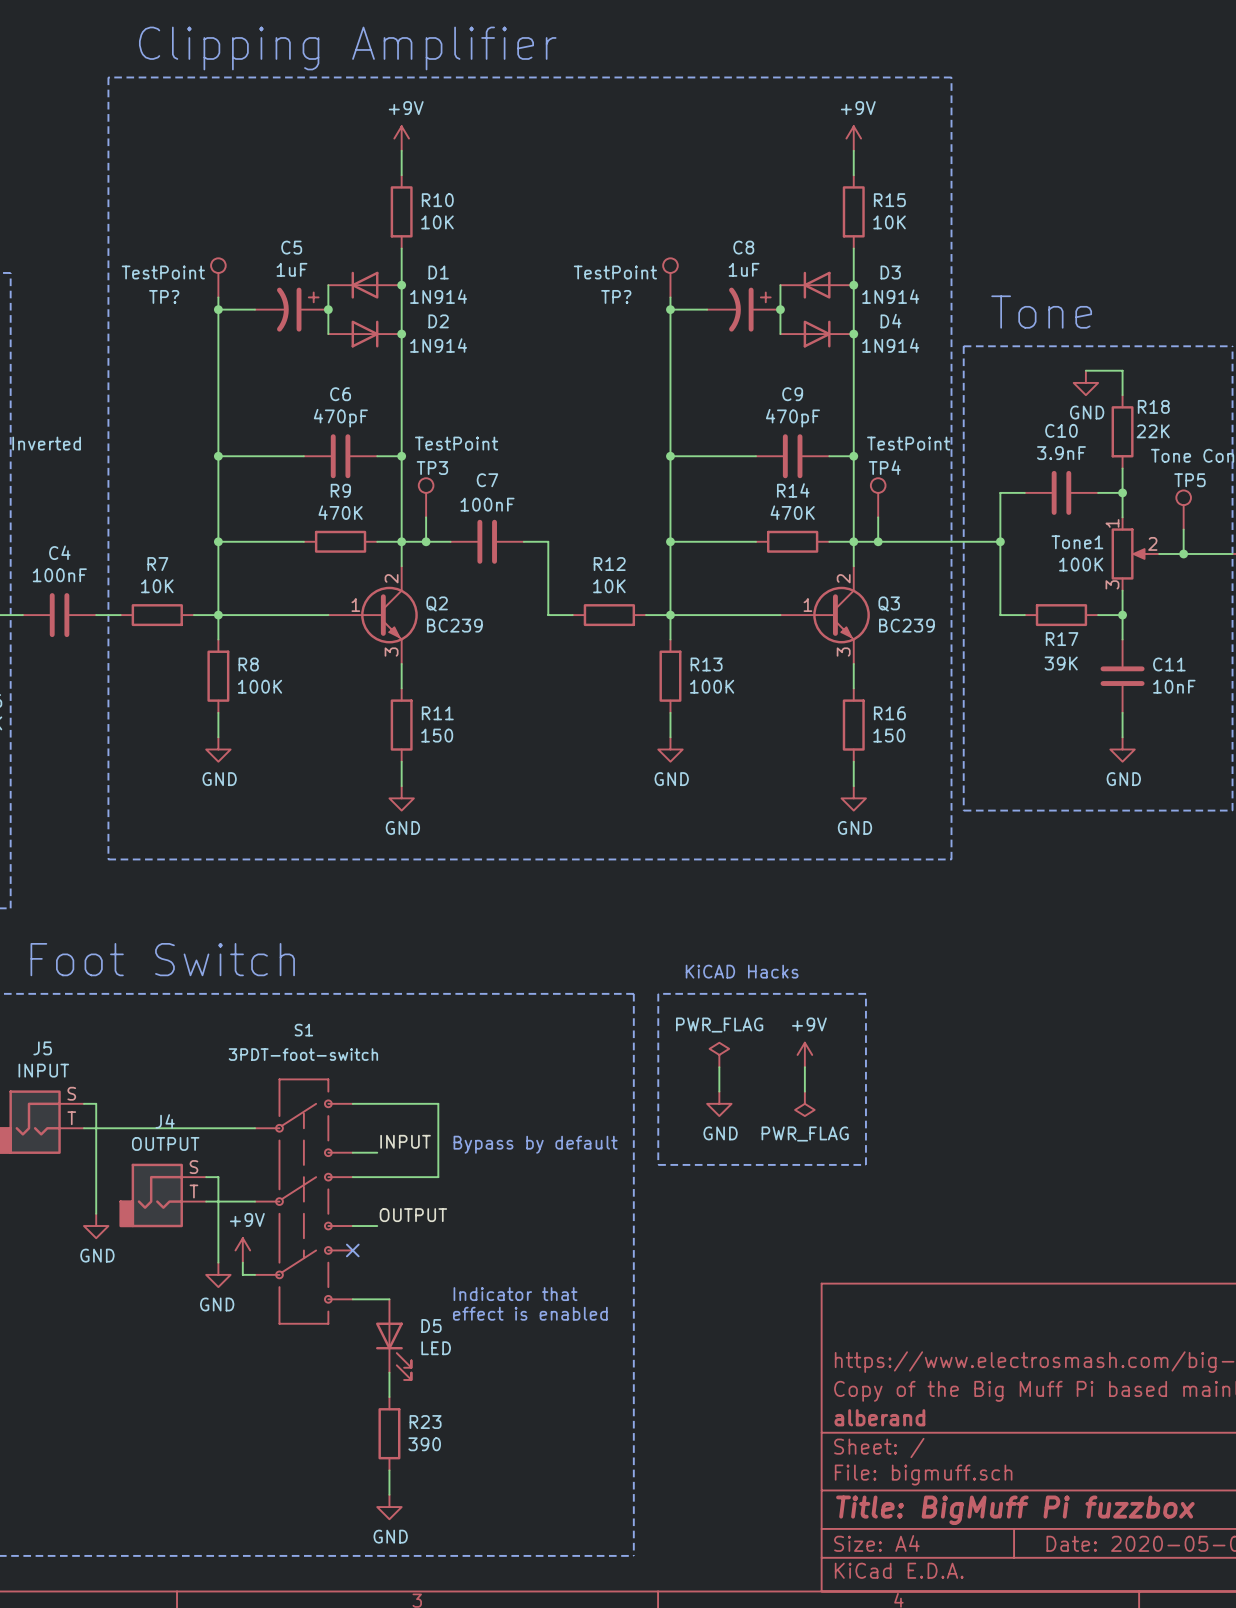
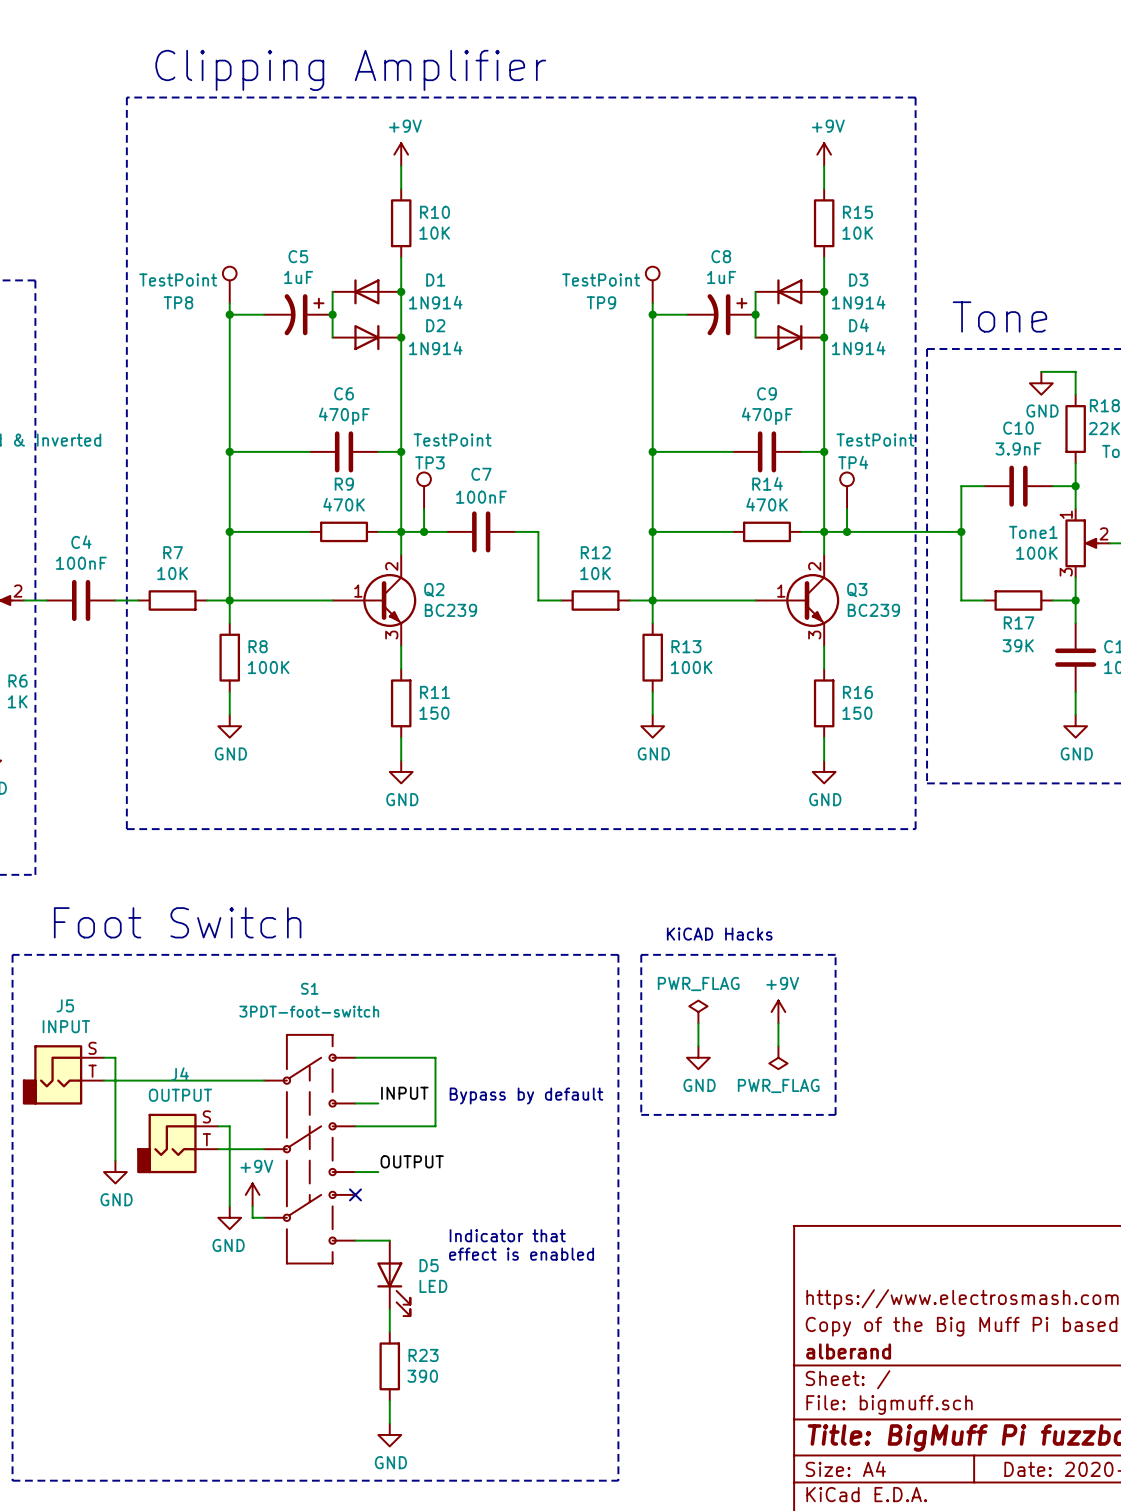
TP? name: TP? (164, 296) -> TP8 (178, 302)
TP? name: TP? (616, 296) -> TP9 (601, 302)

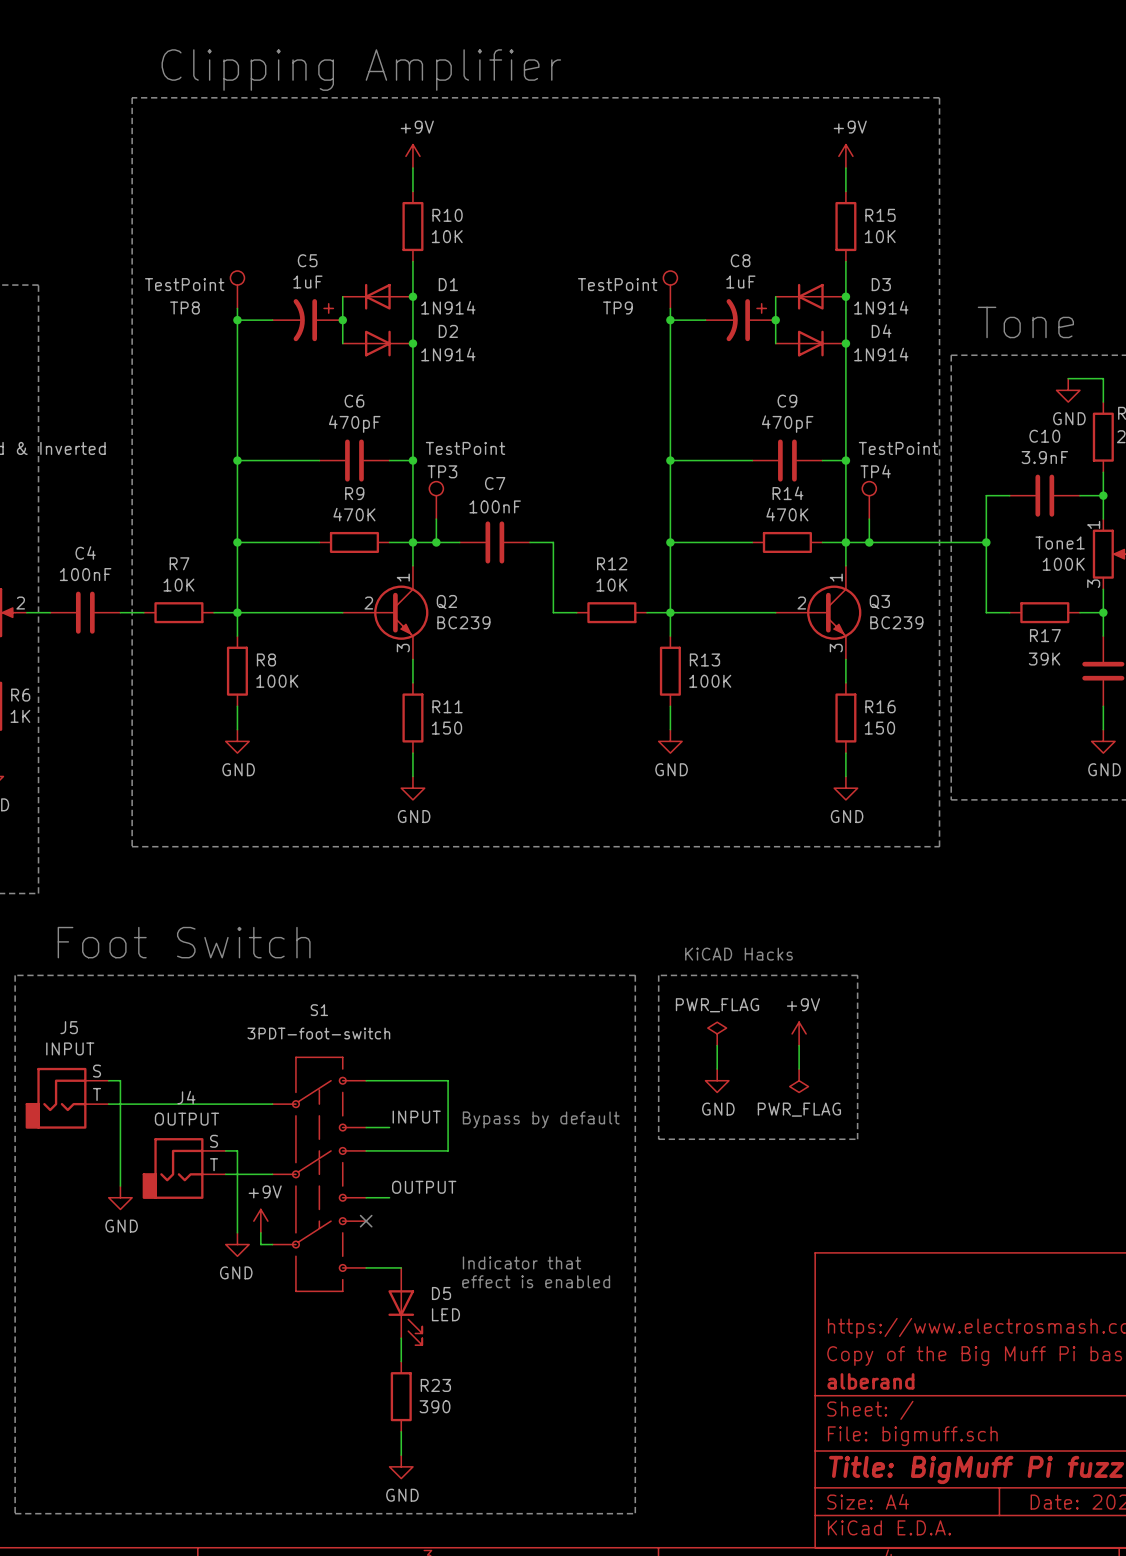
Q2 pin number: 2 (391, 566) -> 1 (403, 577)
Q3 pin number: 2 (814, 566) -> 1 (836, 577)
Q2 pin number: 1 (358, 591) -> 2 (368, 603)
Q3 pin number: 1 (781, 591) -> 2 (801, 603)

